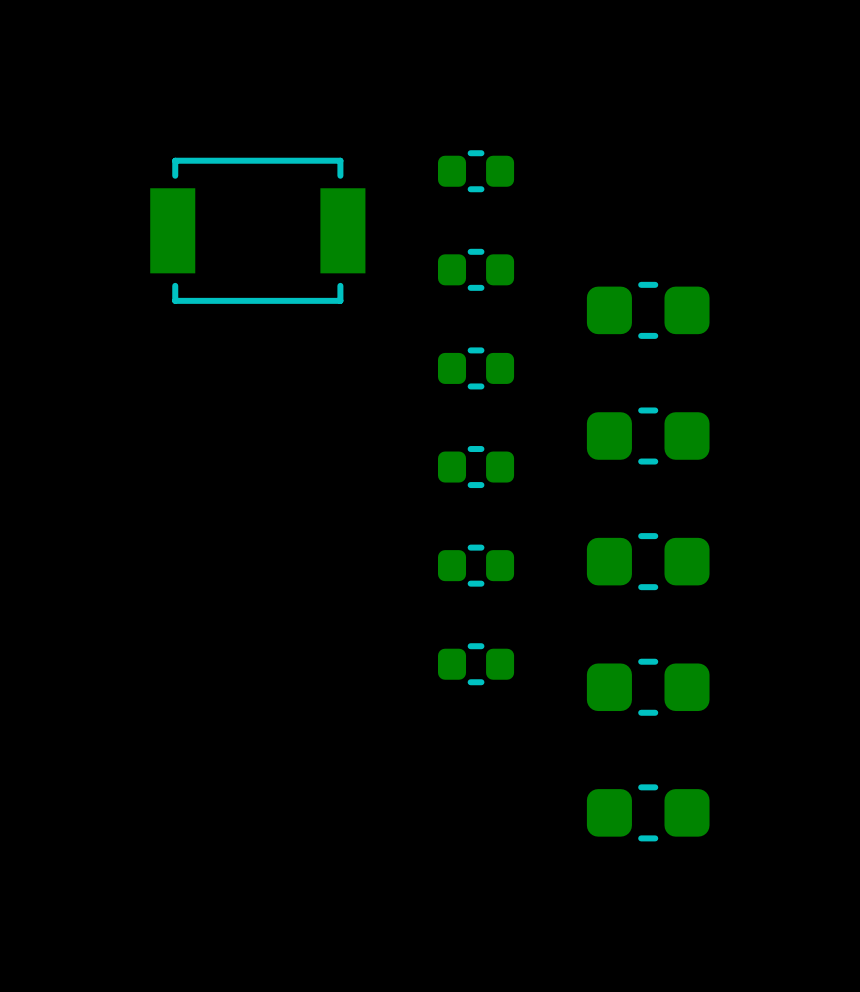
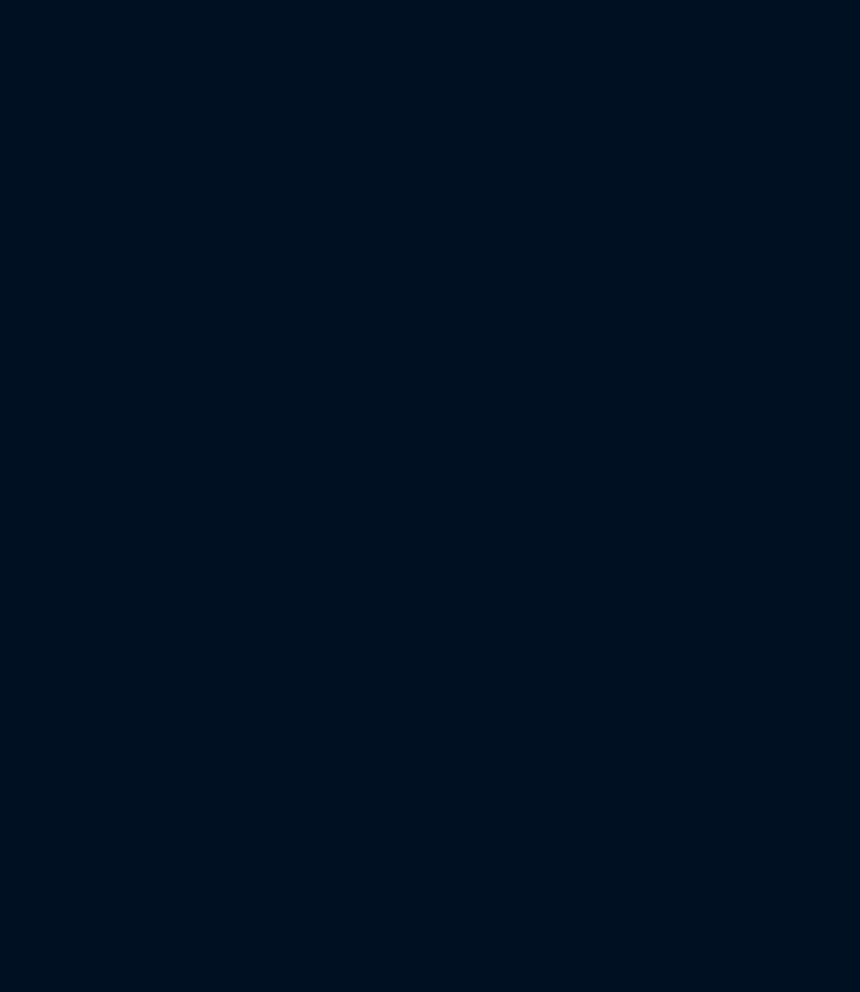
part: (476, 171) -> none
part: (257, 230) -> none
part: (476, 269) -> none
part: (648, 310) -> none
part: (476, 368) -> none
part: (648, 436) -> none
part: (476, 467) -> none
part: (648, 561) -> none
part: (476, 565) -> none
part: (476, 664) -> none
part: (648, 687) -> none
part: (648, 812) -> none

